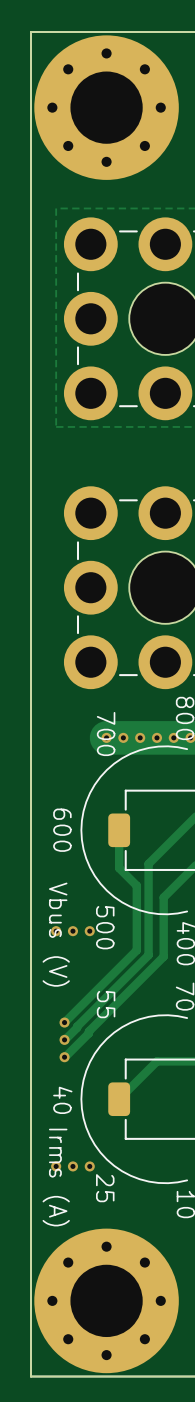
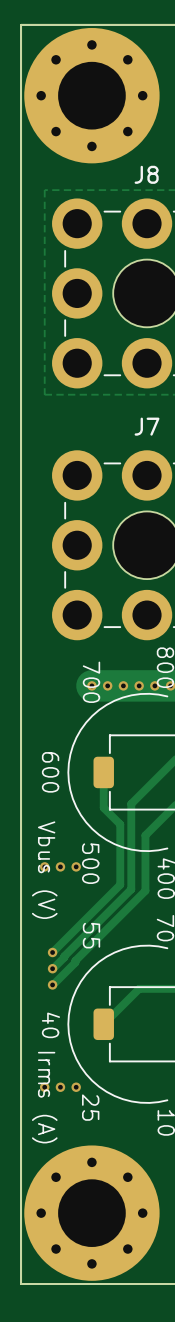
J8 name: none -> J8 (146, 174)
J7 name: none -> J7 (147, 426)

